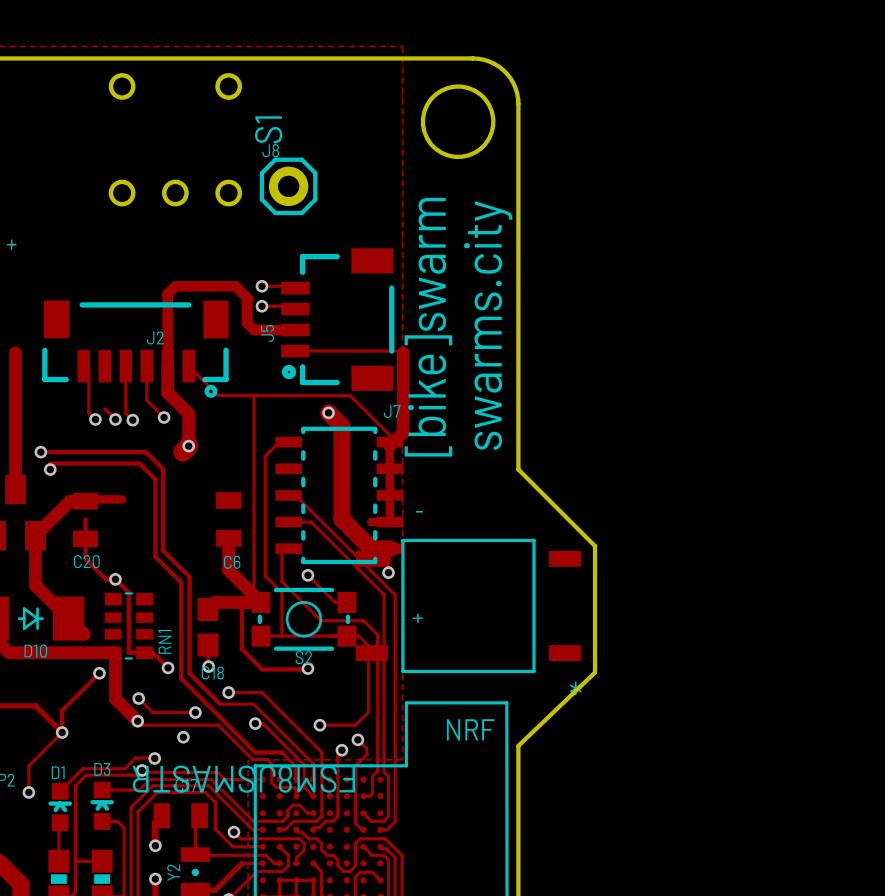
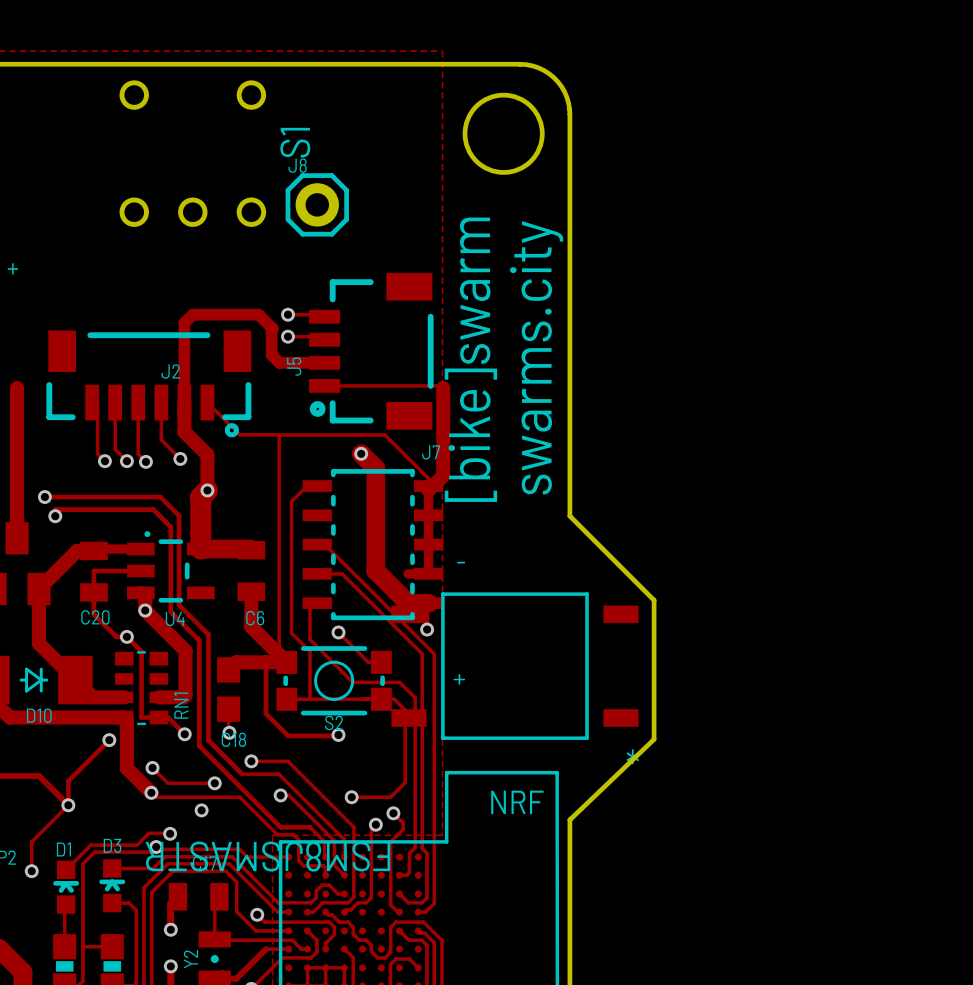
track: none -> (115, 402) (115, 449)
track: none -> (200, 497) (200, 549) (250, 549)
U4: none -> (170, 566)
track: none -> (93, 570) (140, 570)
track: none -> (140, 592) (145, 597) (145, 610) (185, 650) (185, 695) (183, 697) (158, 697)
via: none -> (145, 610)
track: none -> (92, 697) (124, 697)

